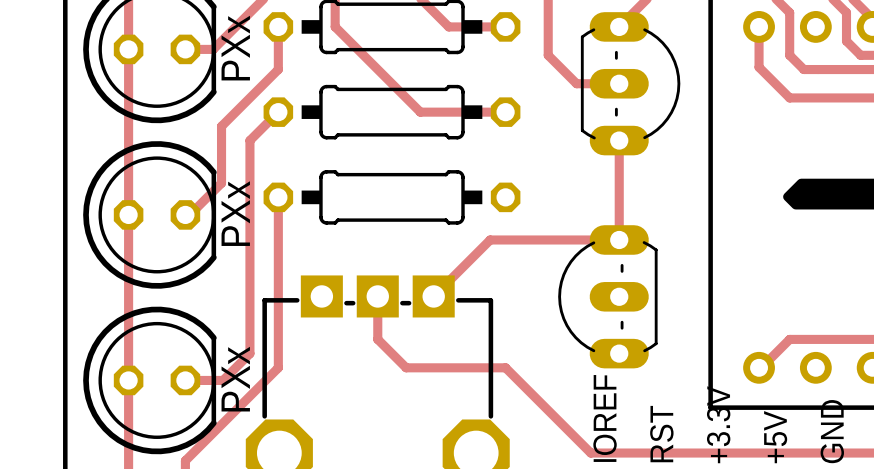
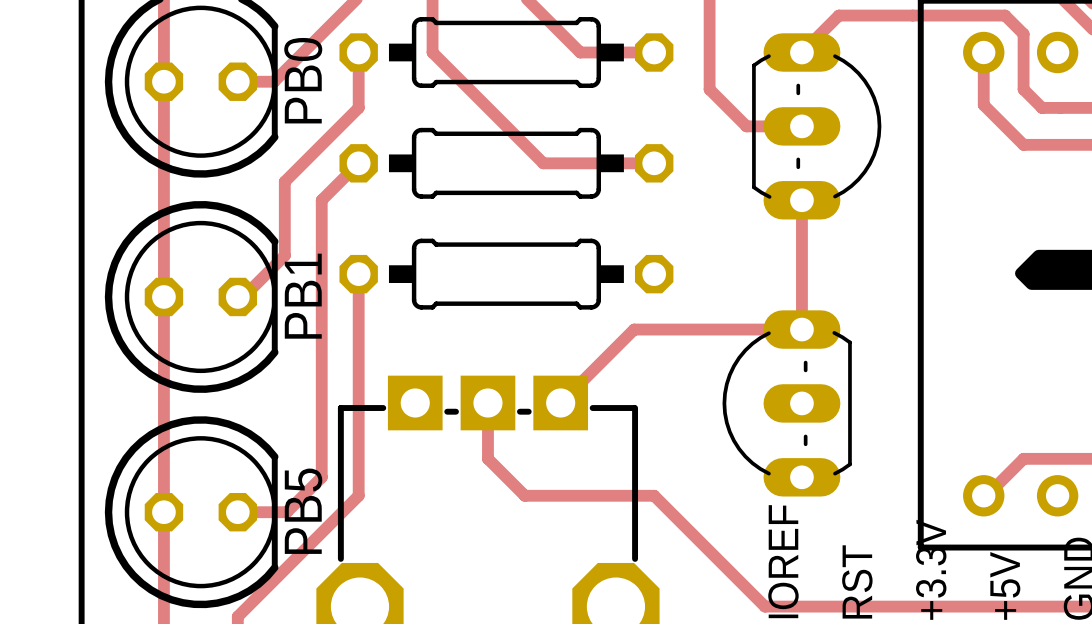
text: PXx (235, 48) -> PB0 (303, 80)
text: PXx (235, 213) -> PB1 (303, 296)
text: PXx (235, 379) -> PB5 (303, 511)

